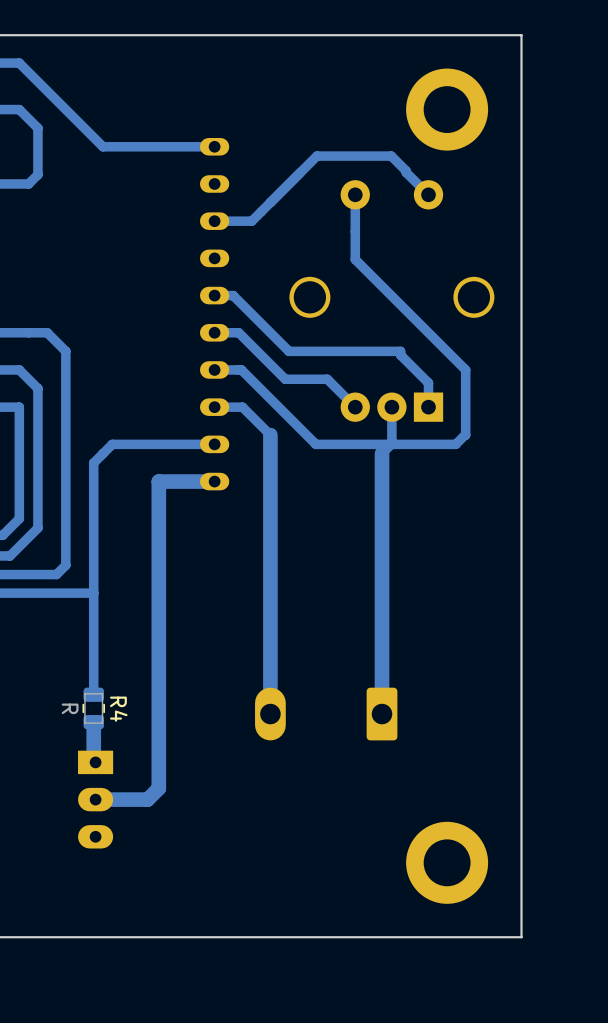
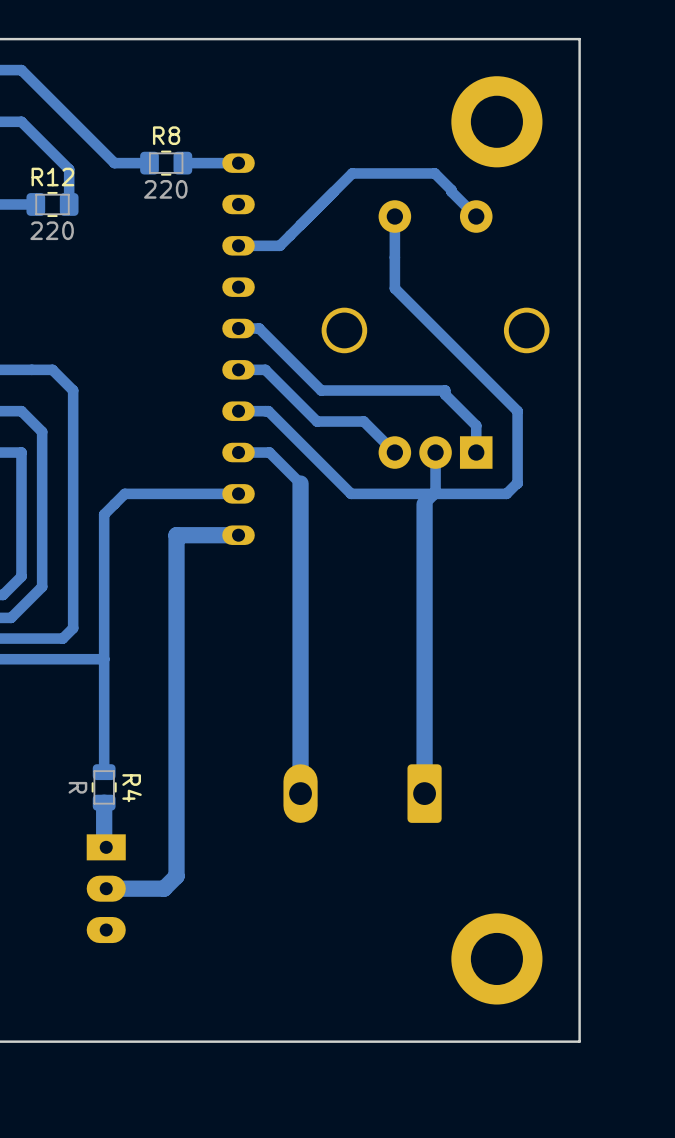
track: (37, 128) (37, 174) (28, 183) -> (42, 142) (69, 169) (69, 204)
R8: none -> 220 (166, 163)
track: (164, 146) (134, 146) -> none
R12: none -> 220 (52, 204)

